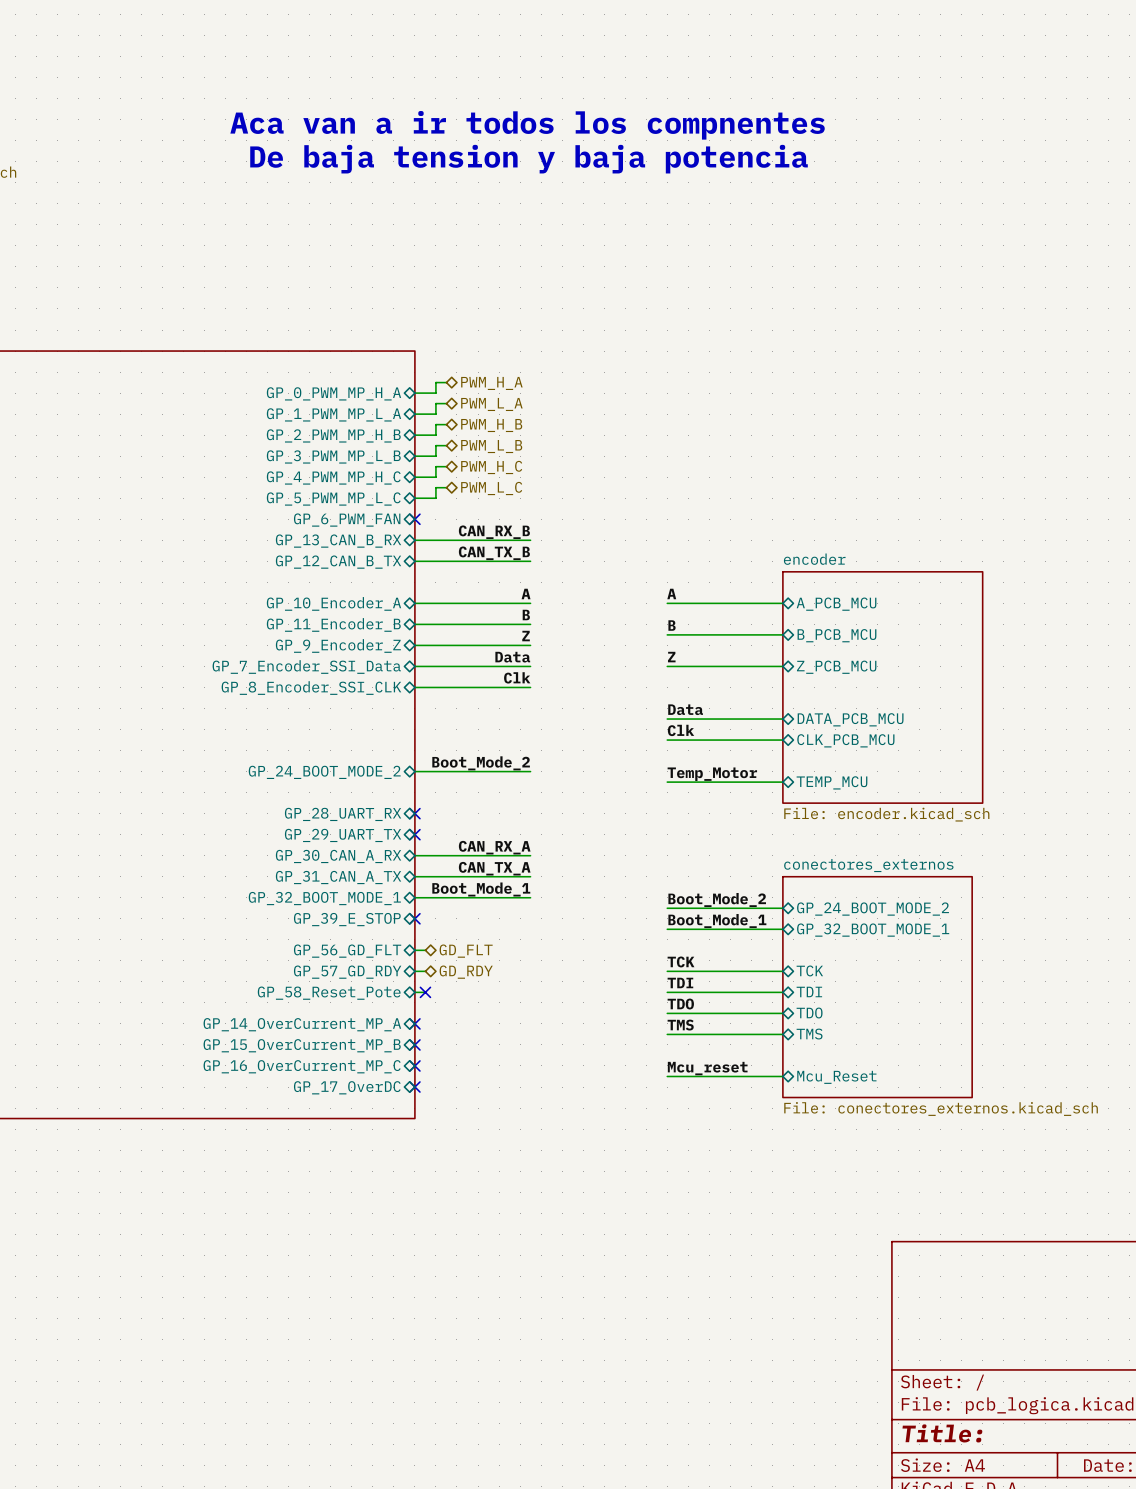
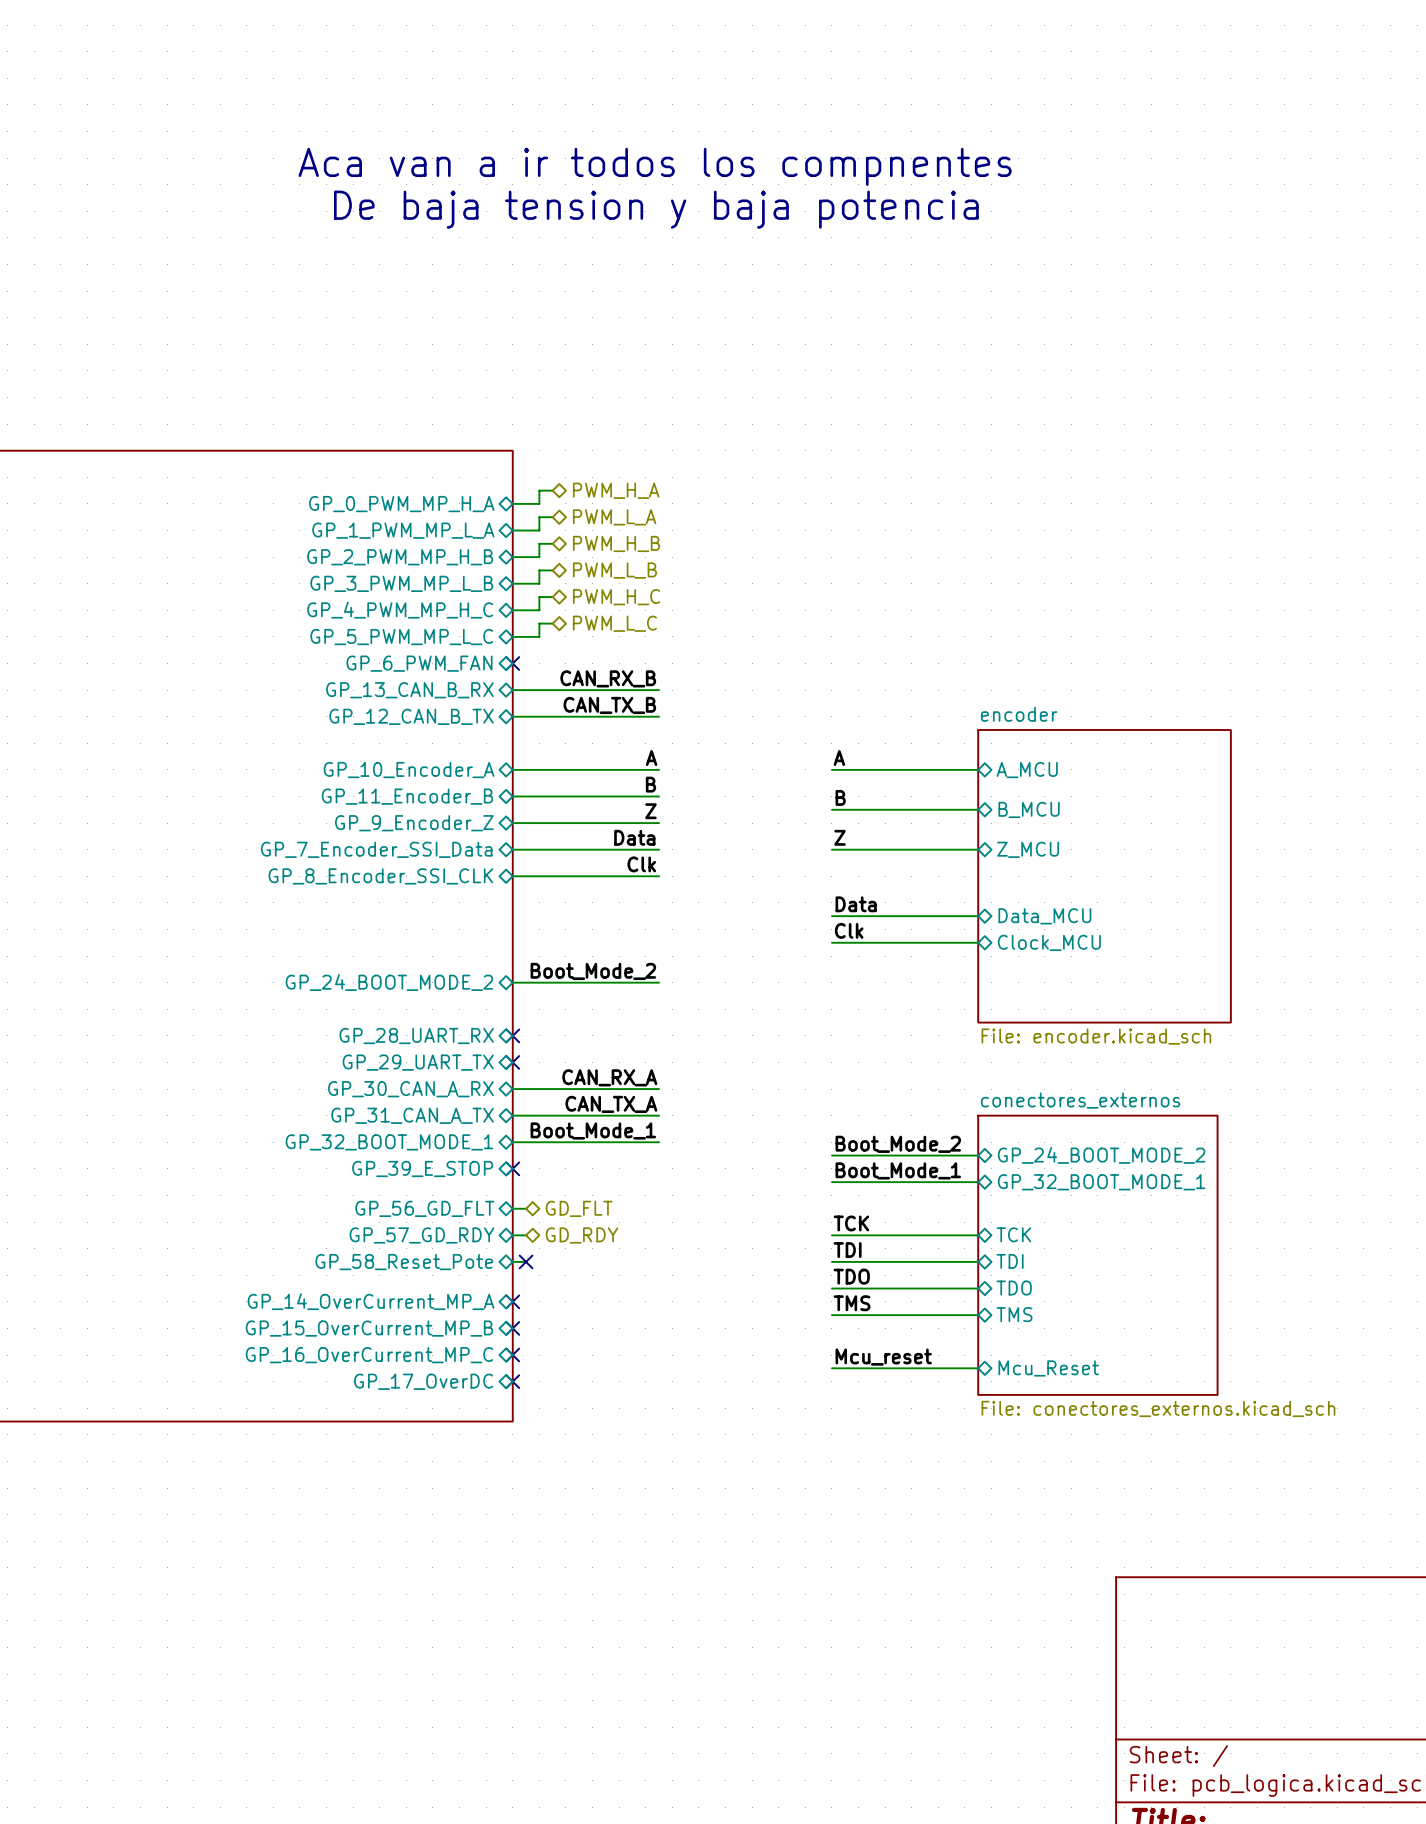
sheet pin: A_PCB_MCU (836, 604) -> A_MCU (1027, 770)
sheet pin: B_PCB_MCU (836, 635) -> B_MCU (1029, 809)
sheet pin: Z_PCB_MCU (836, 667) -> Z_MCU (1028, 849)
sheet pin: DATA_PCB_MCU (850, 719) -> Data_MCU (1044, 916)
sheet pin: CLK_PCB_MCU (845, 740) -> Clock_MCU (1049, 942)
label: Temp_Motor (712, 774) -> none
wire: (667, 782) (782, 782) -> none
sheet pin: TEMP_MCU (831, 782) -> none

